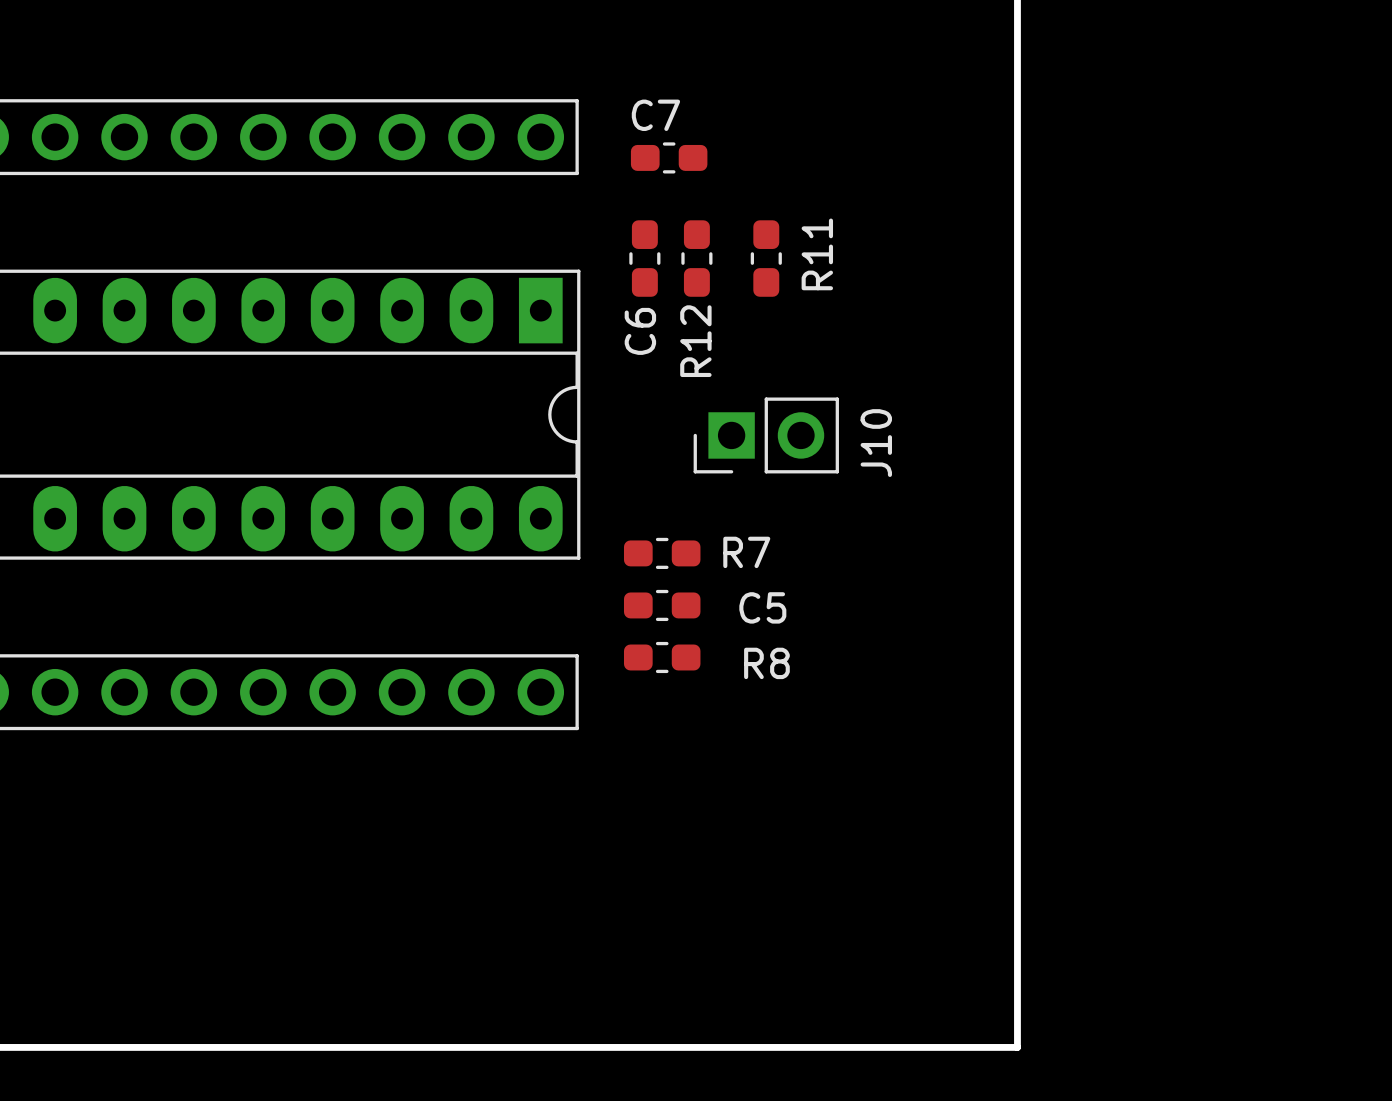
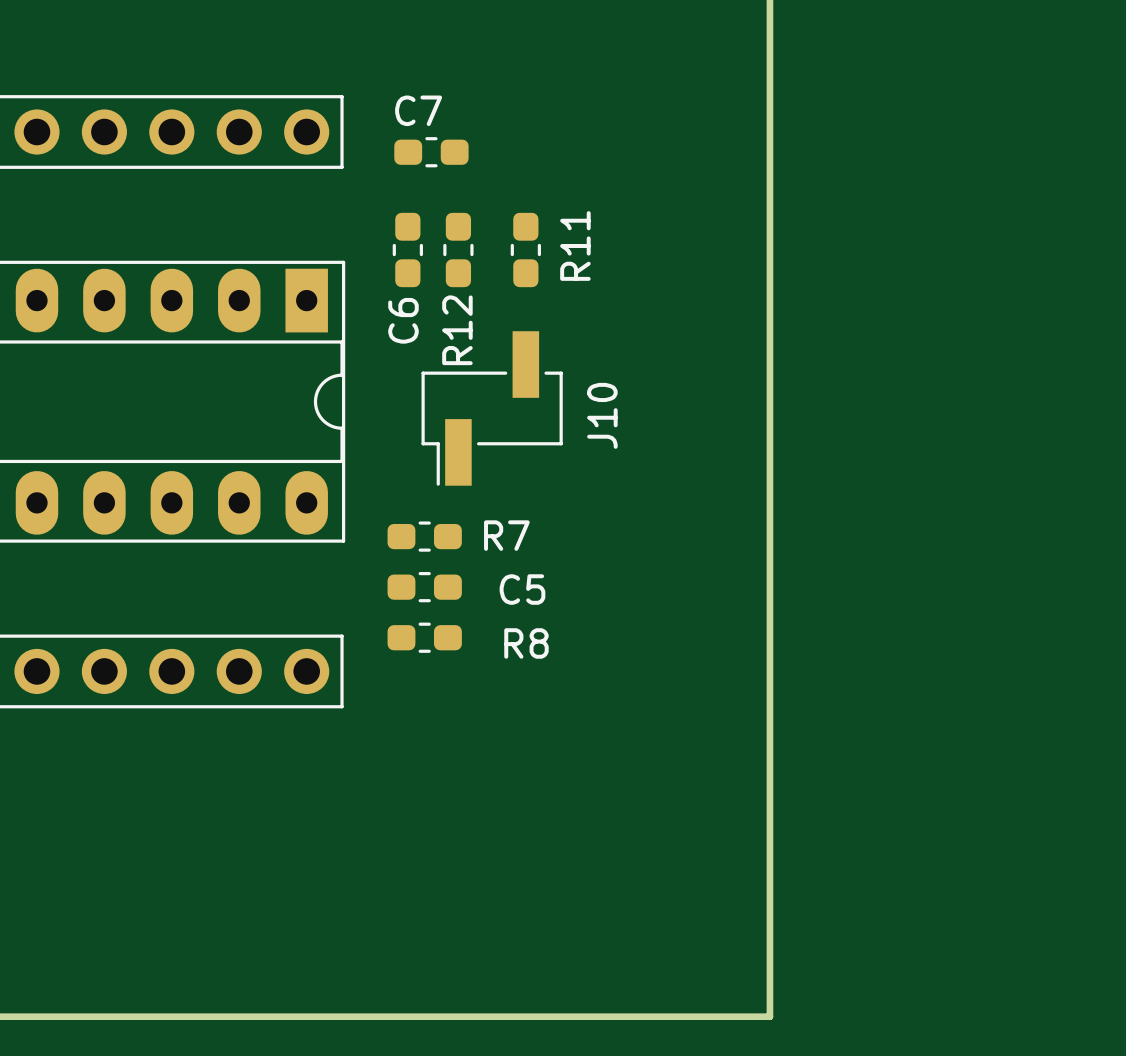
J10 footprint: [693, 397, 839, 474] -> [421, 331, 563, 486]

